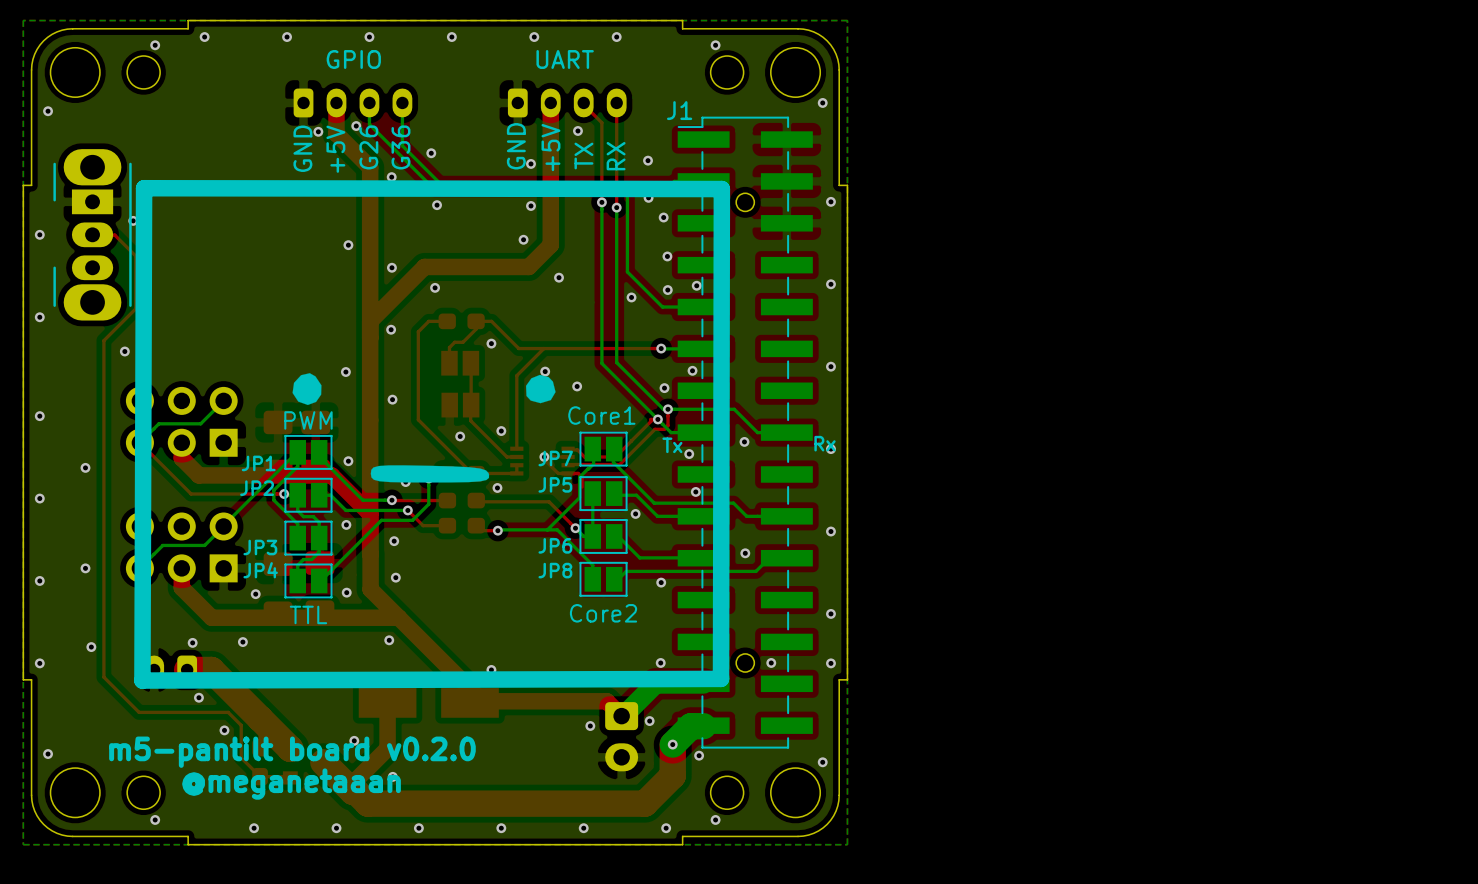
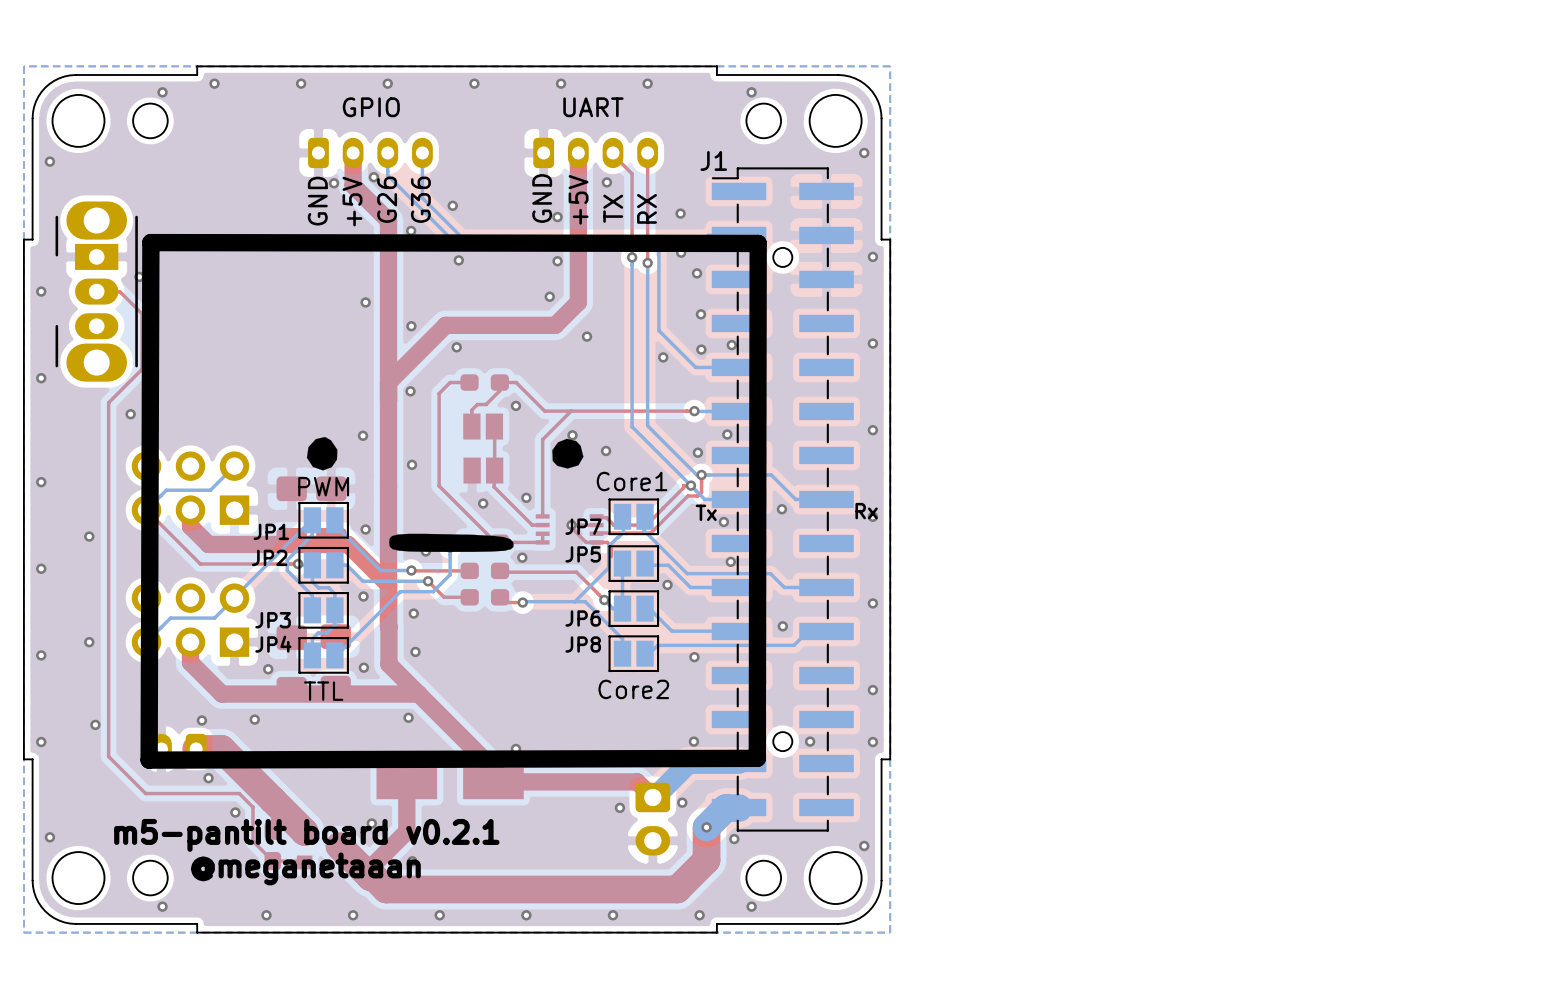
text: m5-pantilt board v0.2.0 (292, 752) -> m5-pantilt board v0.2.1 (306, 835)

